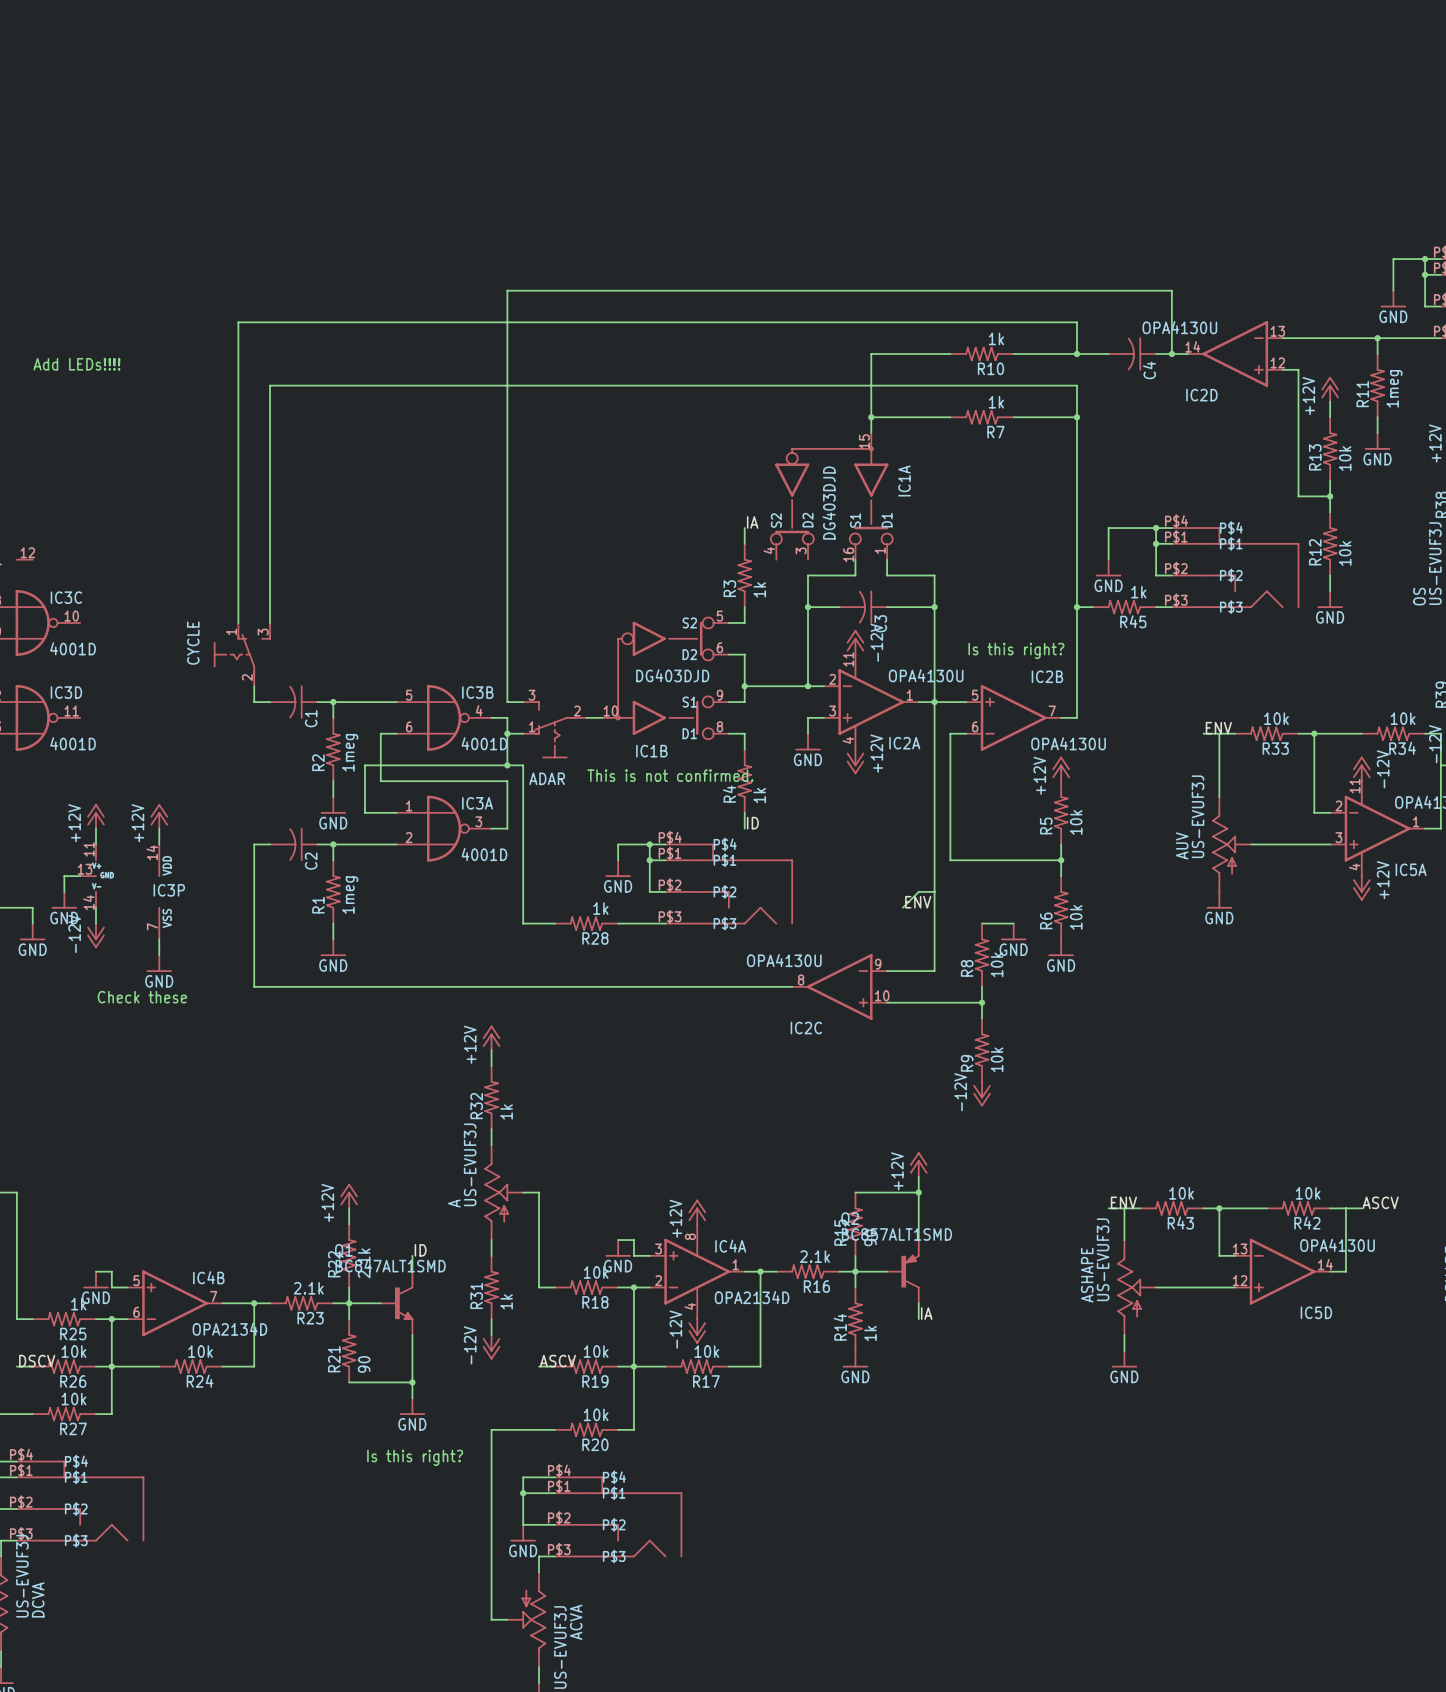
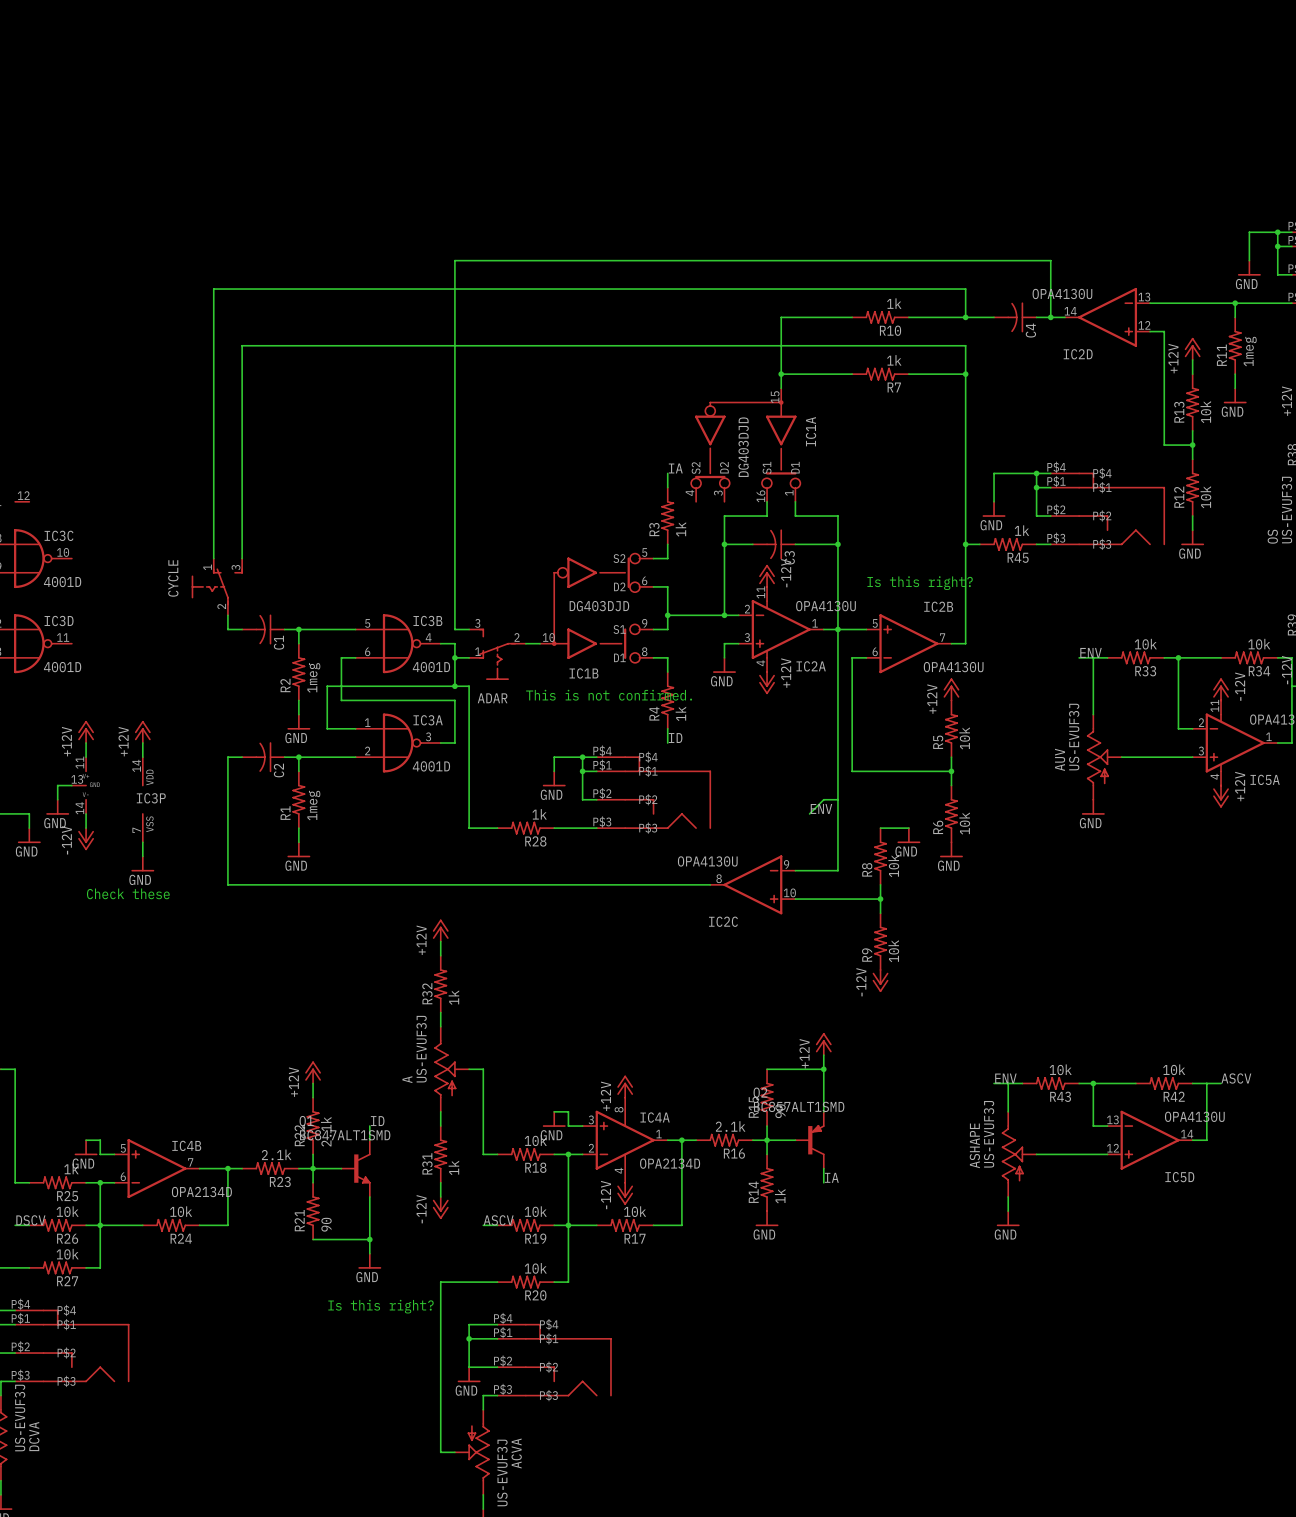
text: Add LEDs!!!! (76, 364) -> none

